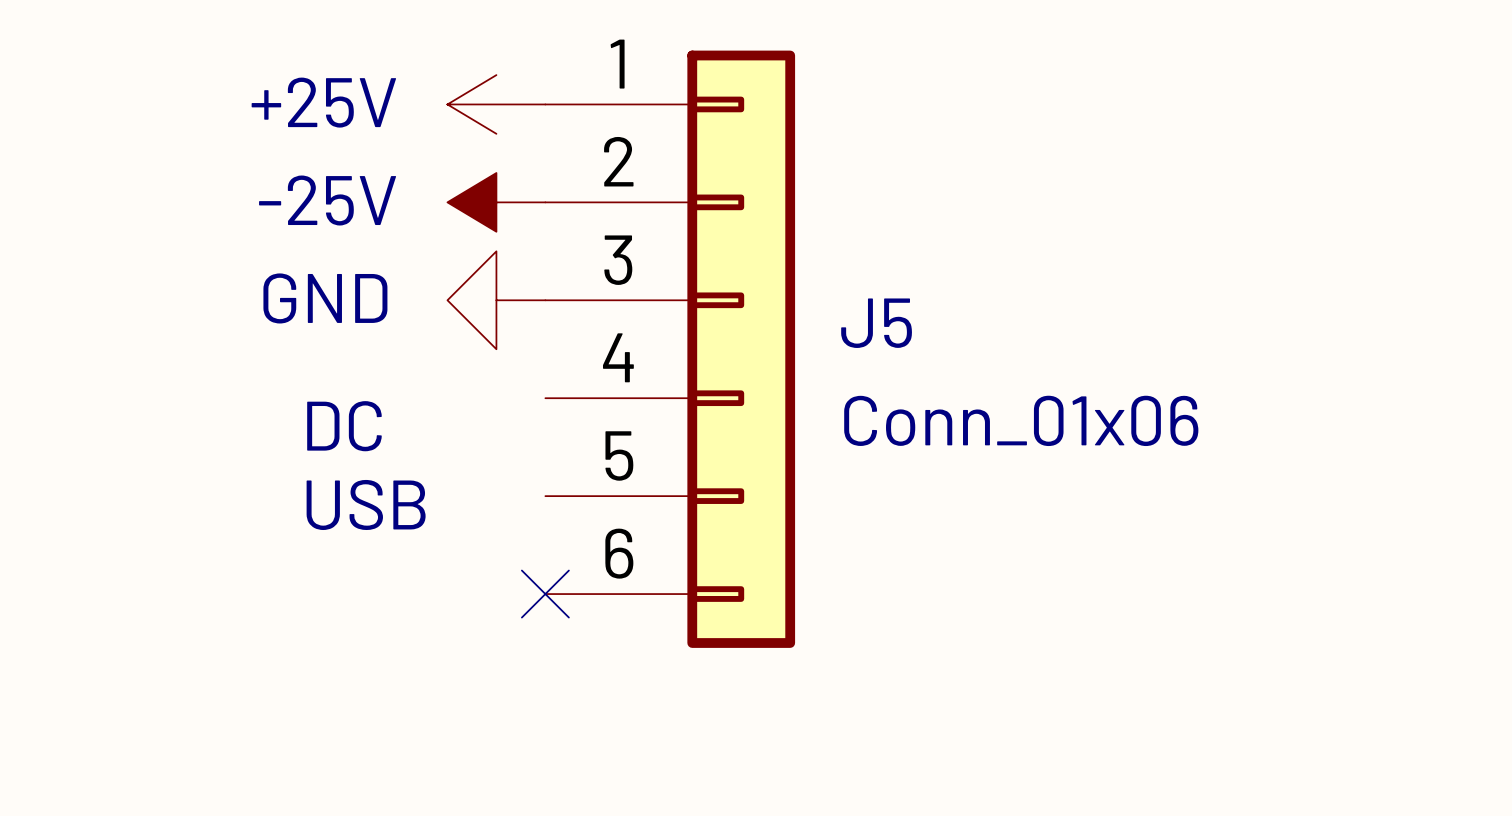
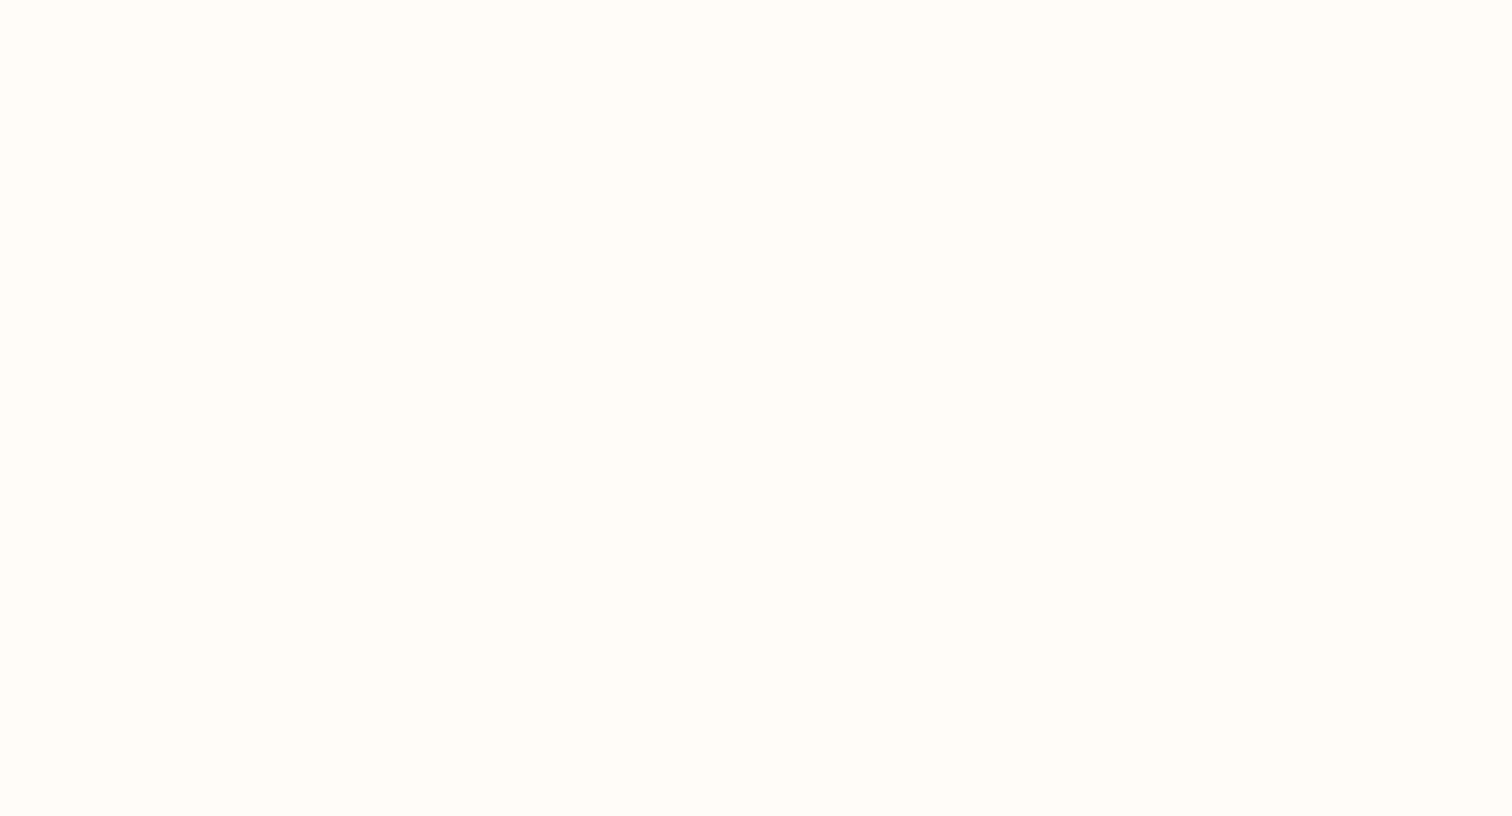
power symbol: +25V (496, 104) -> none
power symbol: -25V (496, 202) -> none
power symbol: GND (496, 300) -> none
J5: Conn_01x06 (670, 349) -> none
text: DC (344, 426) -> none
text: USB (366, 504) -> none
no-connect mark: (545, 594) -> none

